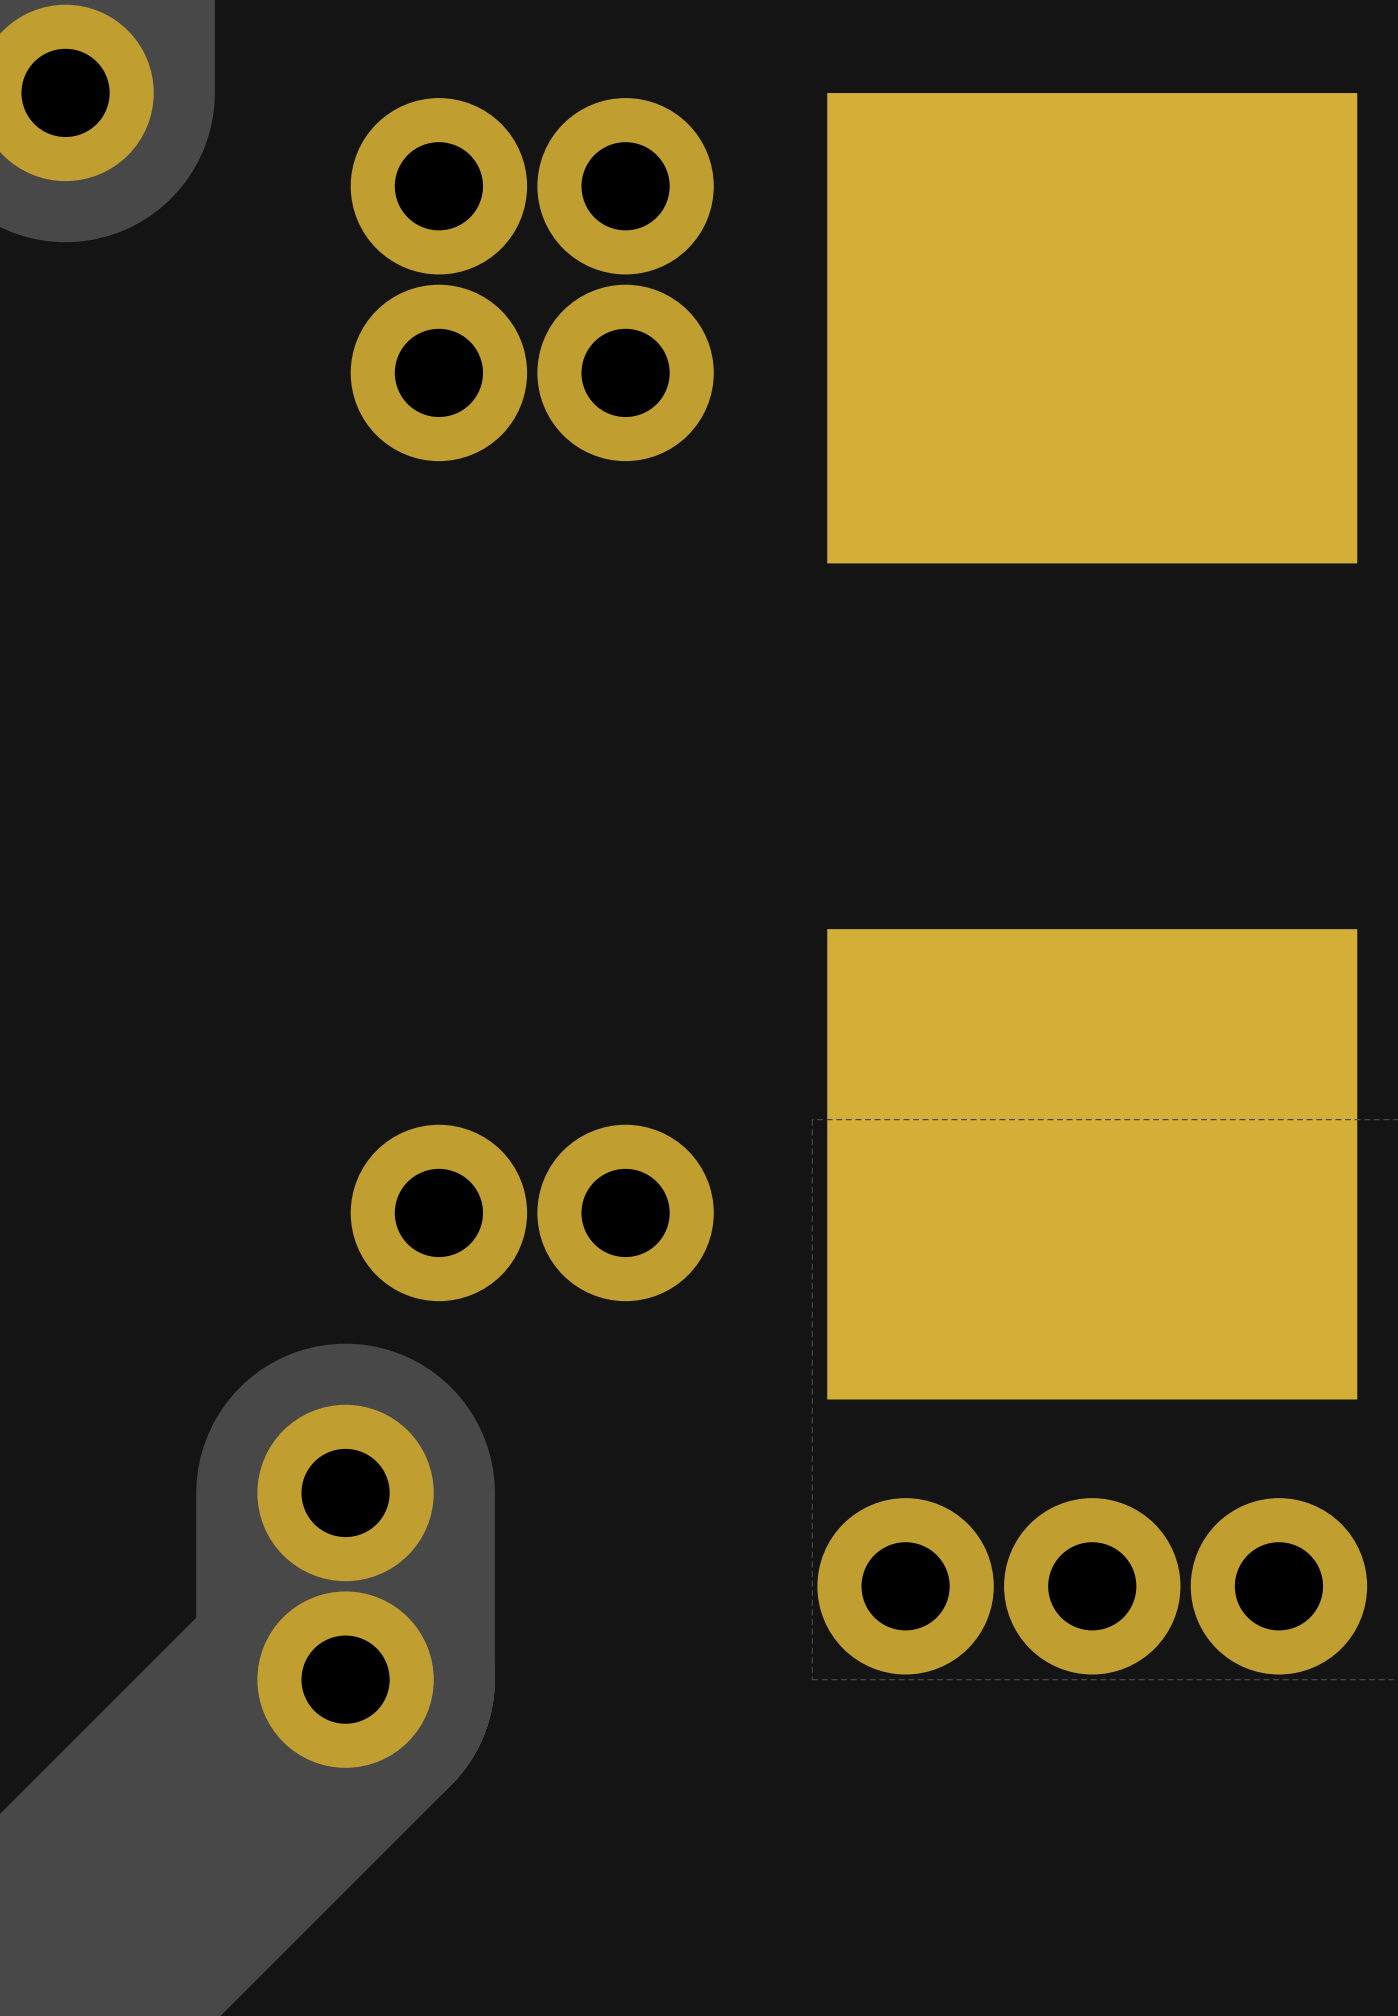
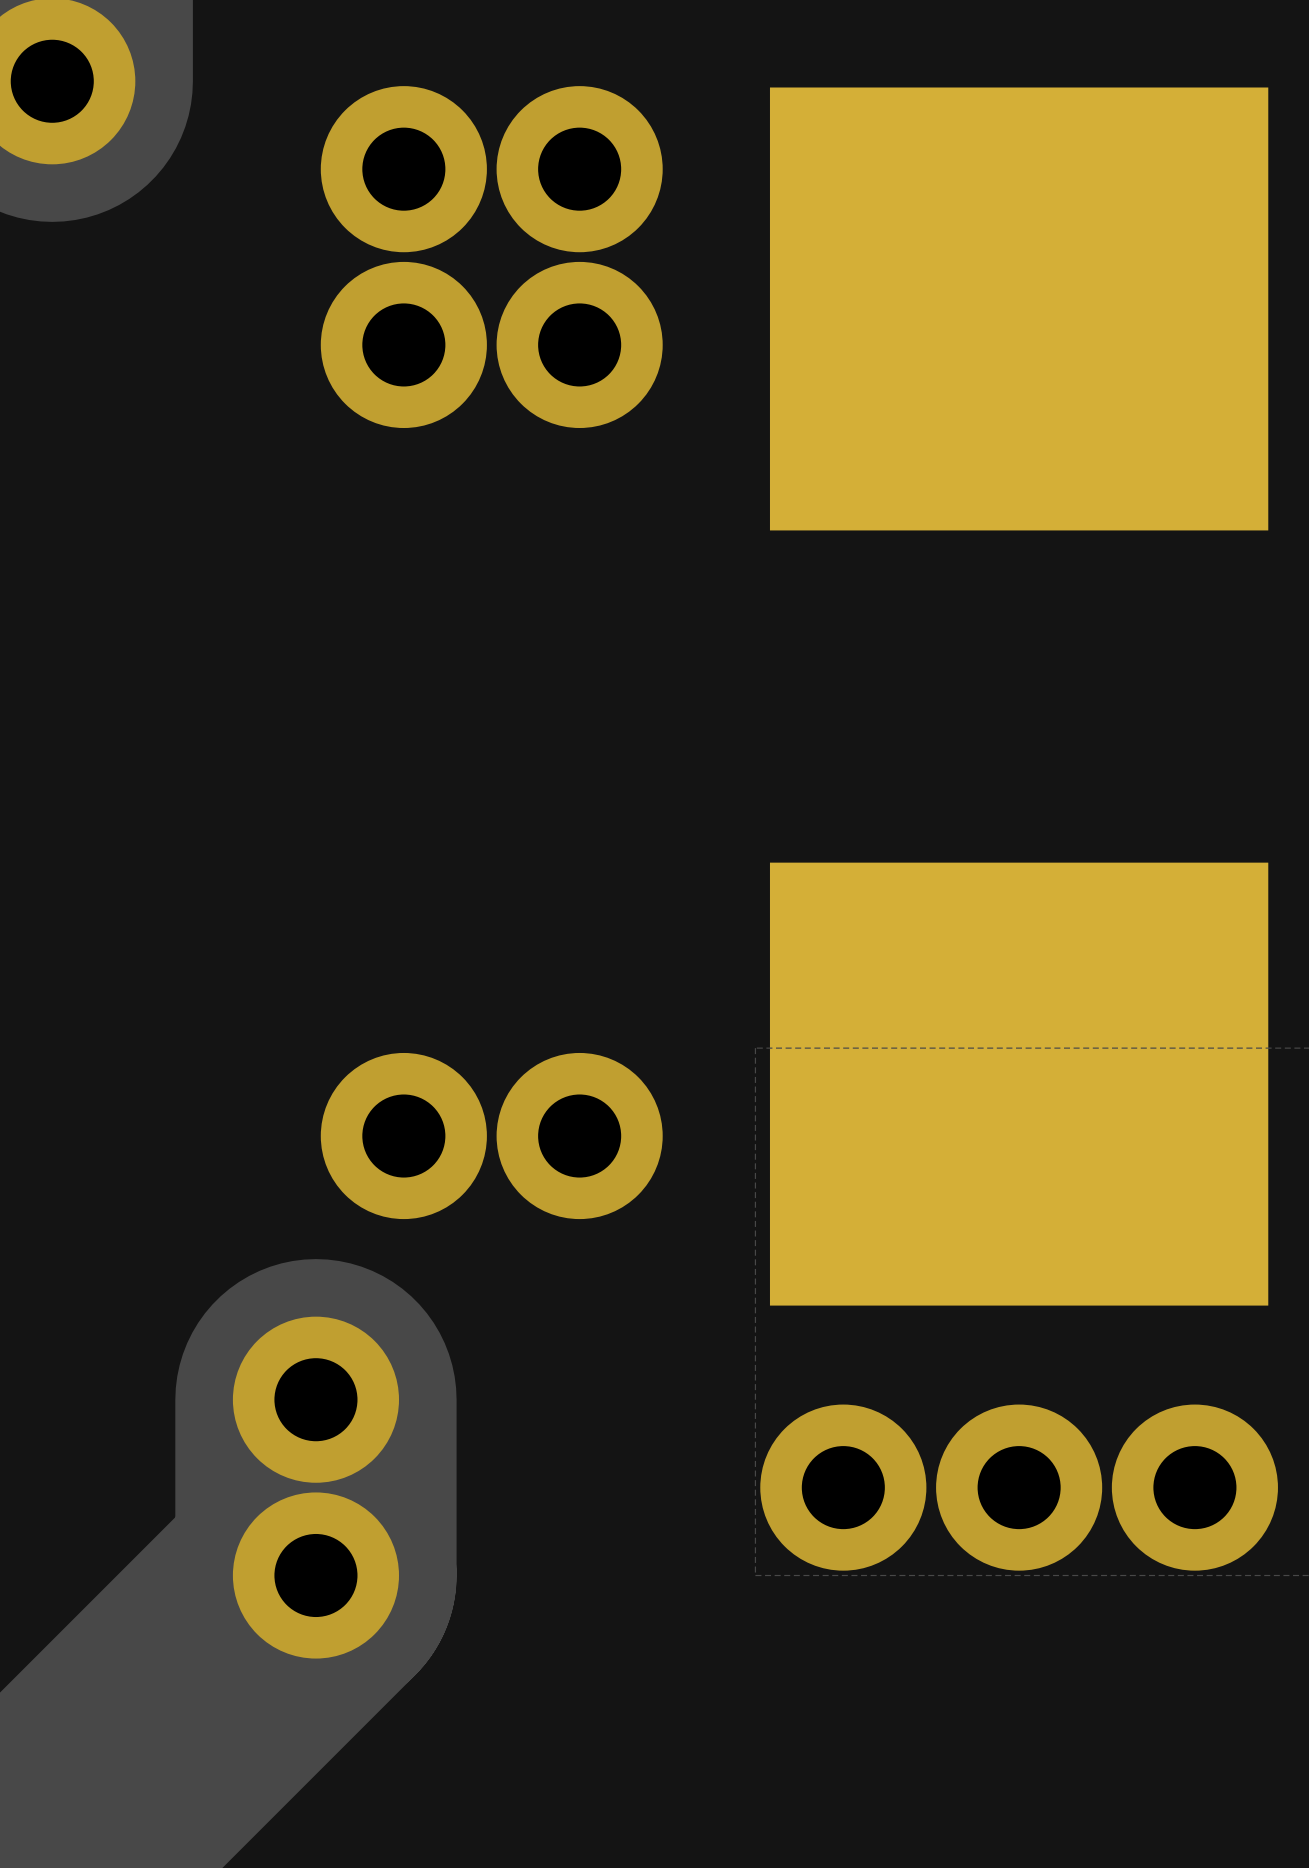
part footprint: [827, 93, 1358, 1400] -> [769, 87, 1269, 1306]

